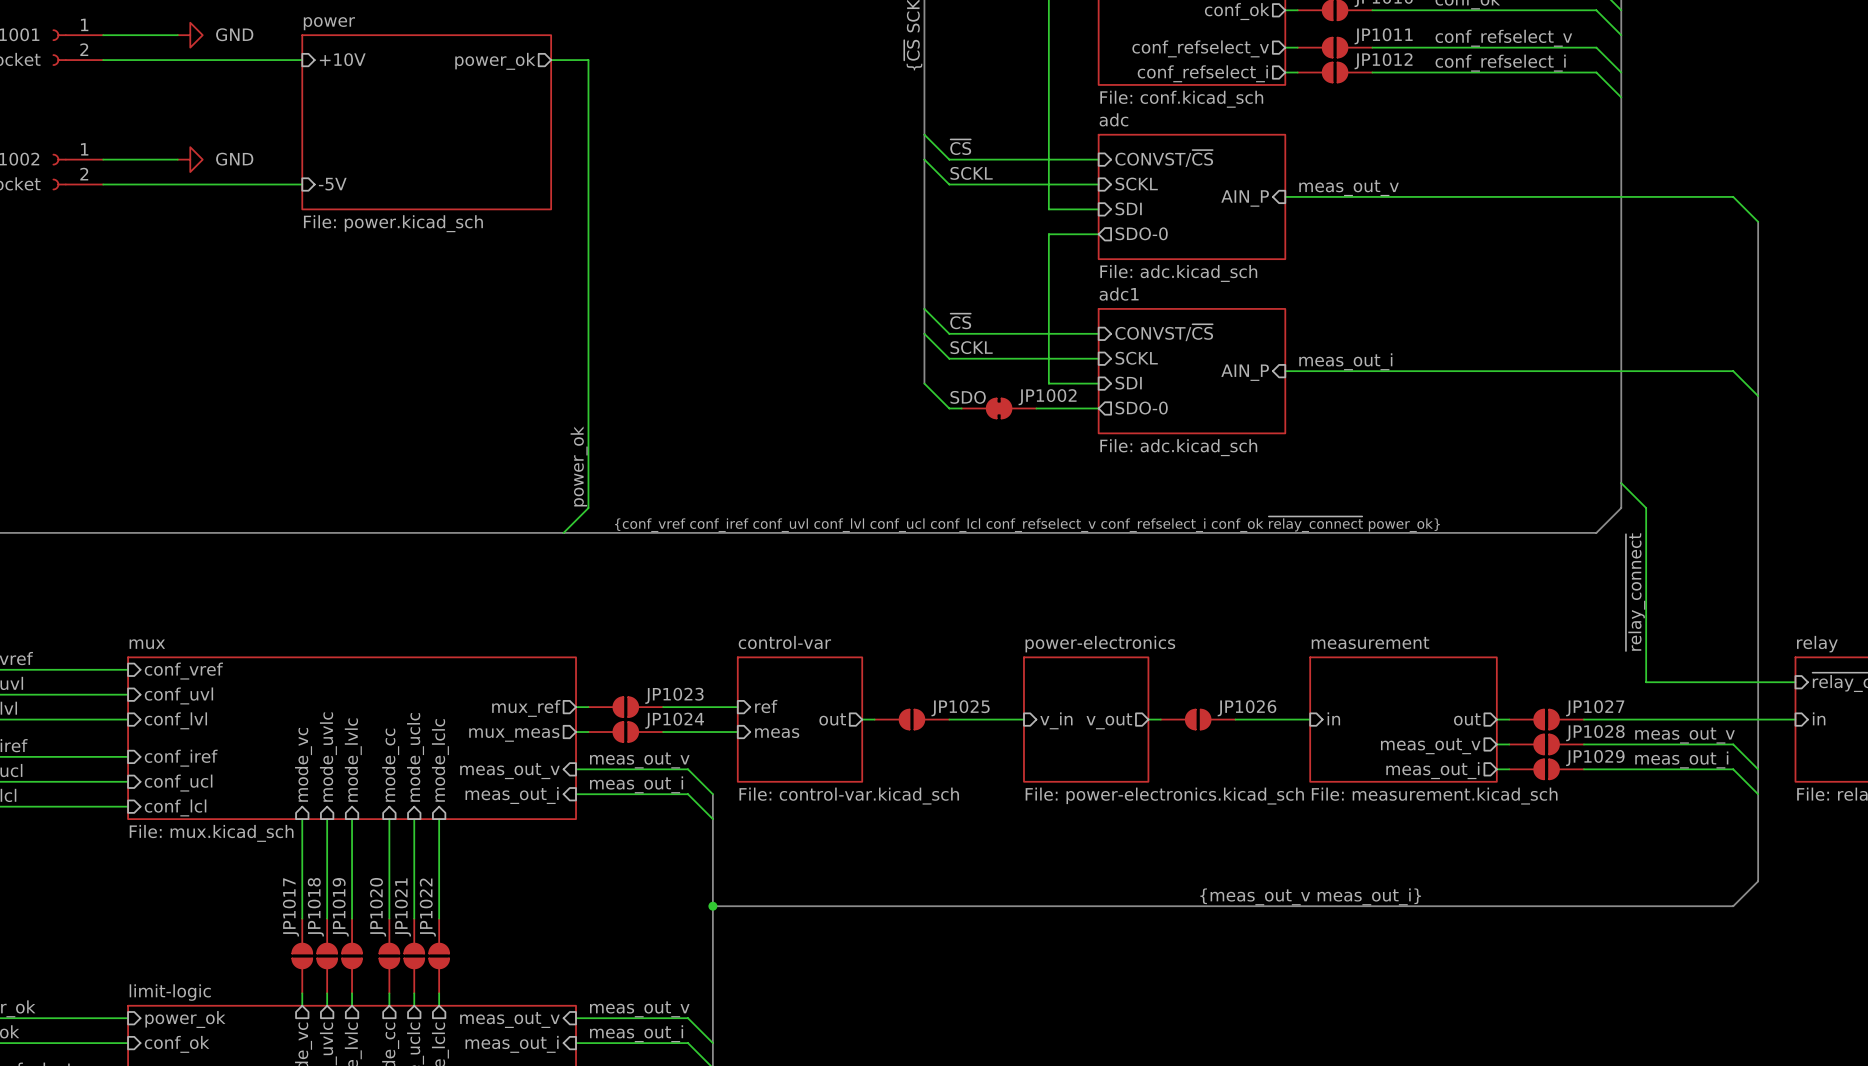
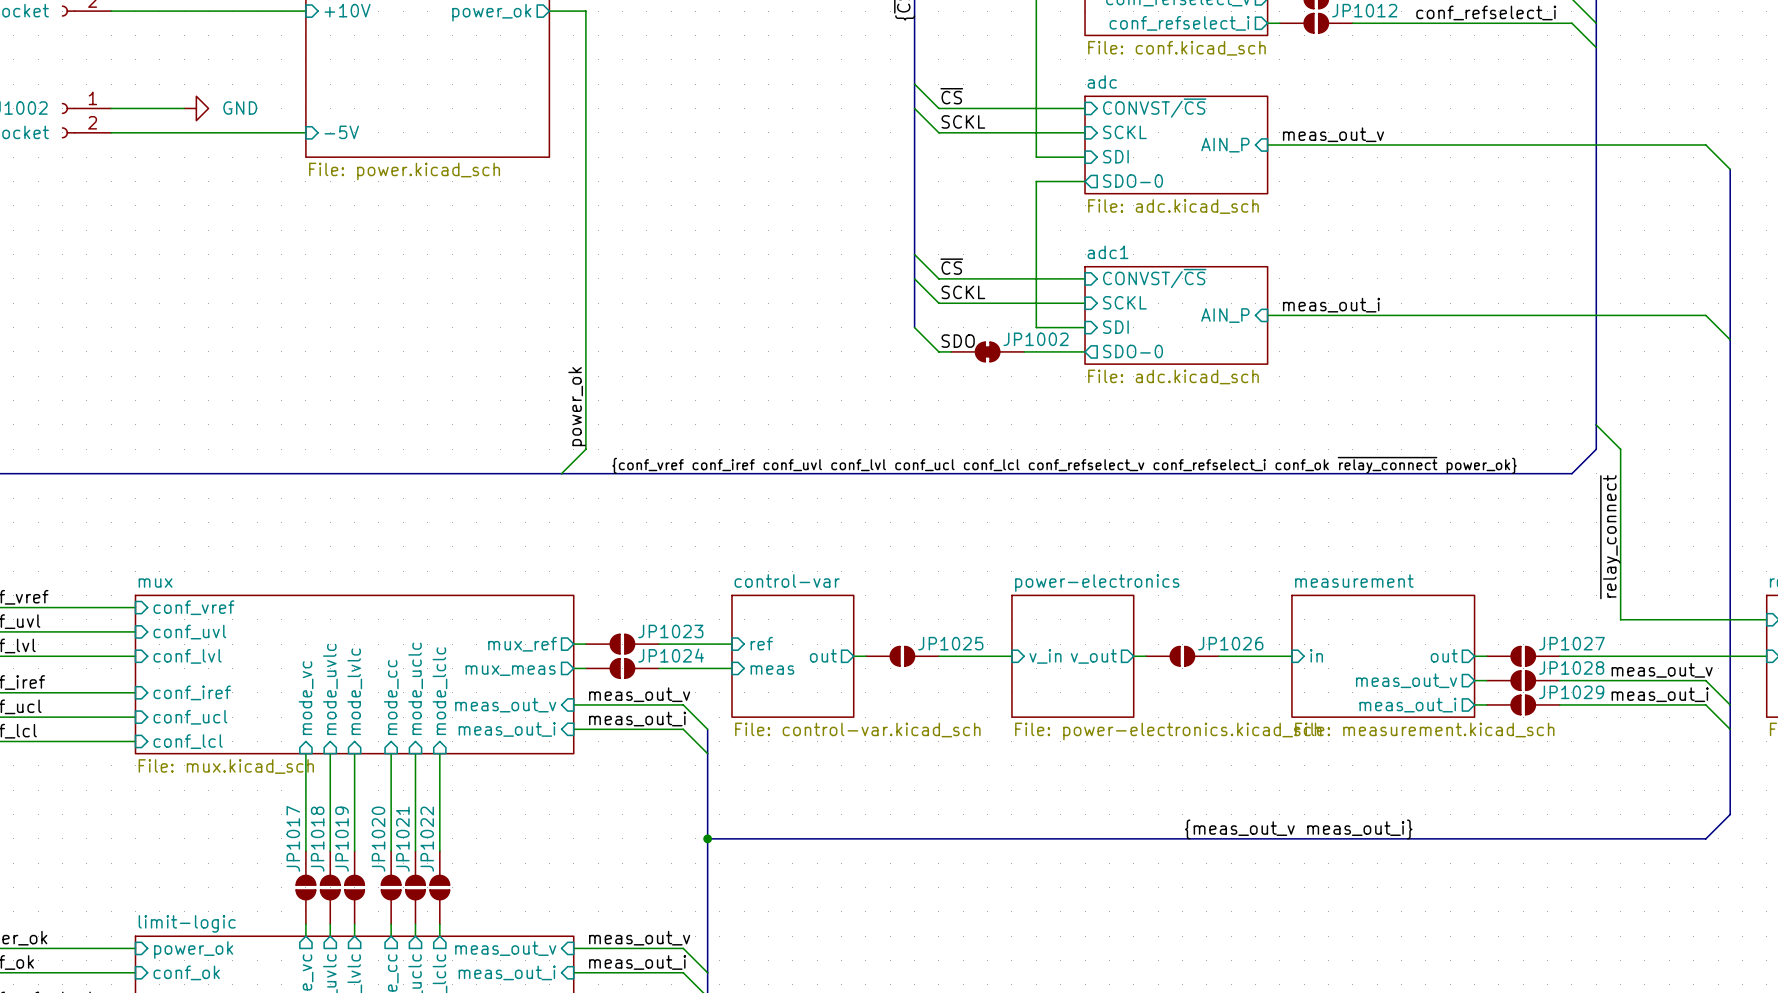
sheet adc shape: [1097, 133, 1287, 260] -> [1084, 95, 1269, 195]
sheet adc1 shape: [1097, 308, 1287, 435] -> [1084, 265, 1269, 365]

